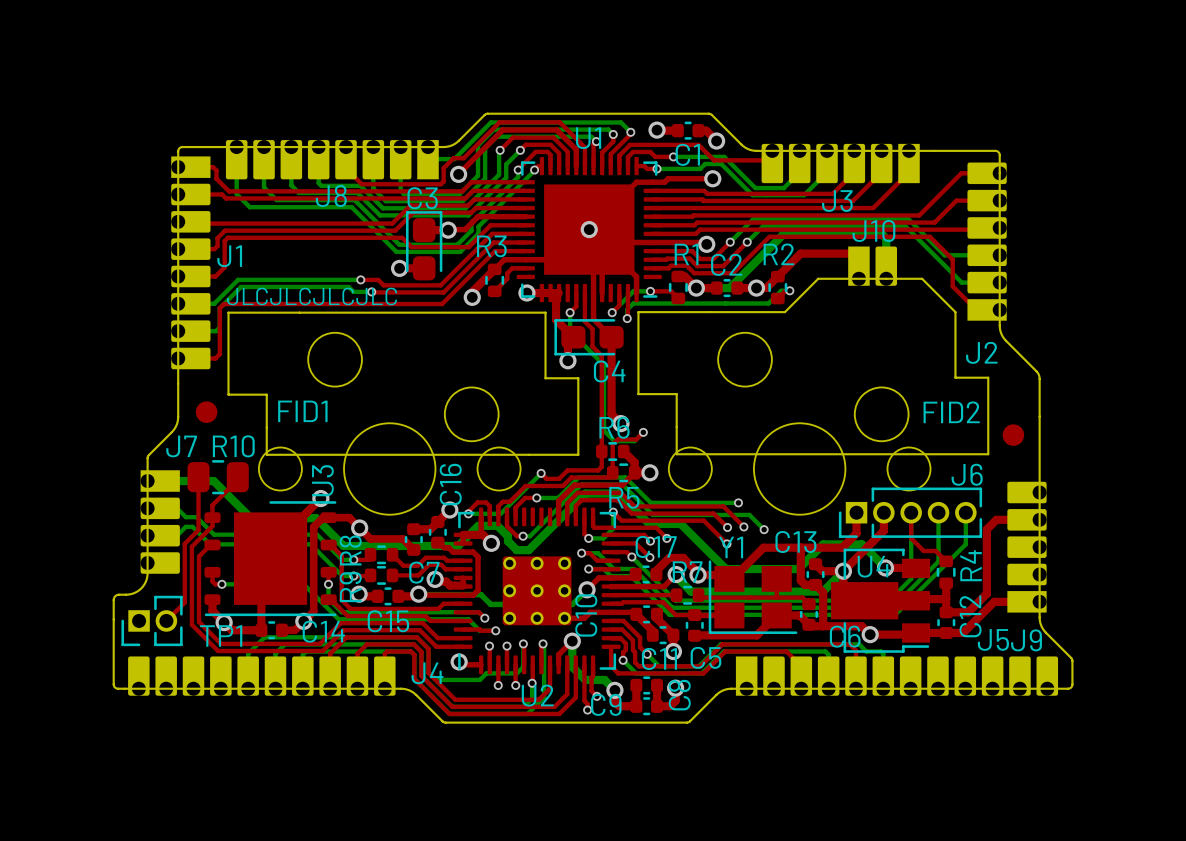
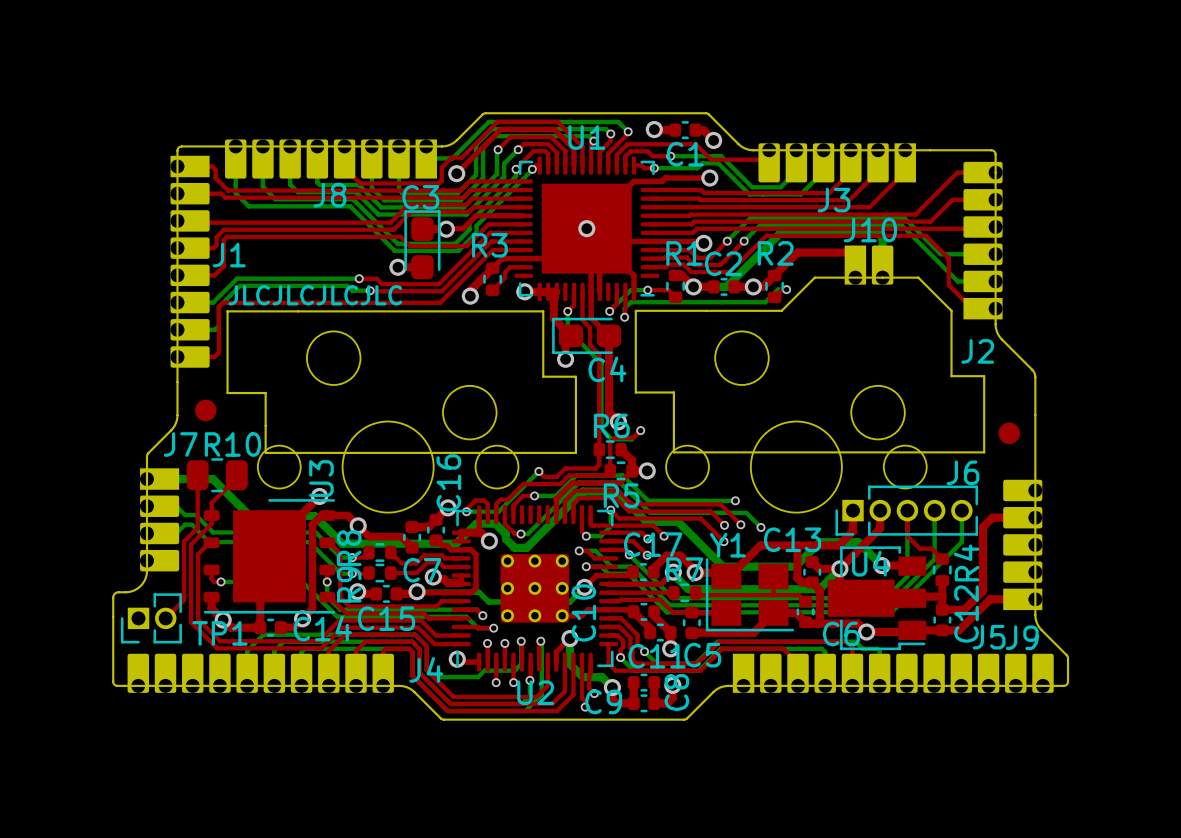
FID1 name: FID1 (302, 411) -> none
FID2 name: FID2 (951, 412) -> none

